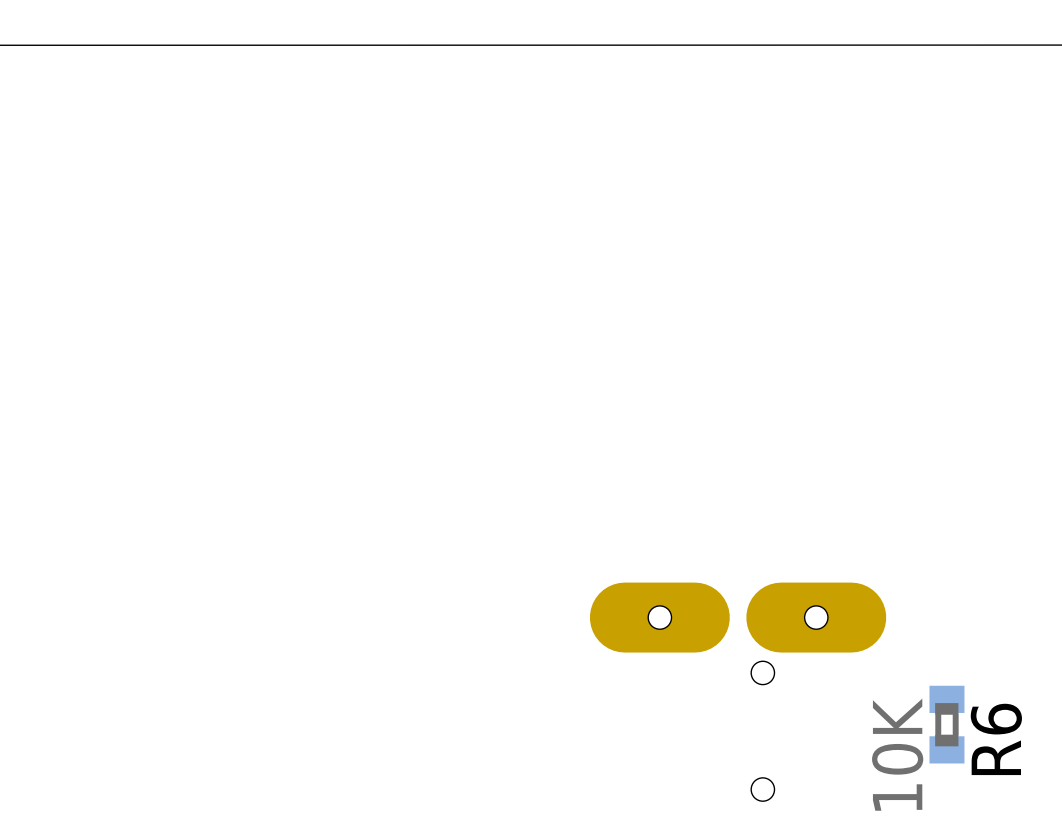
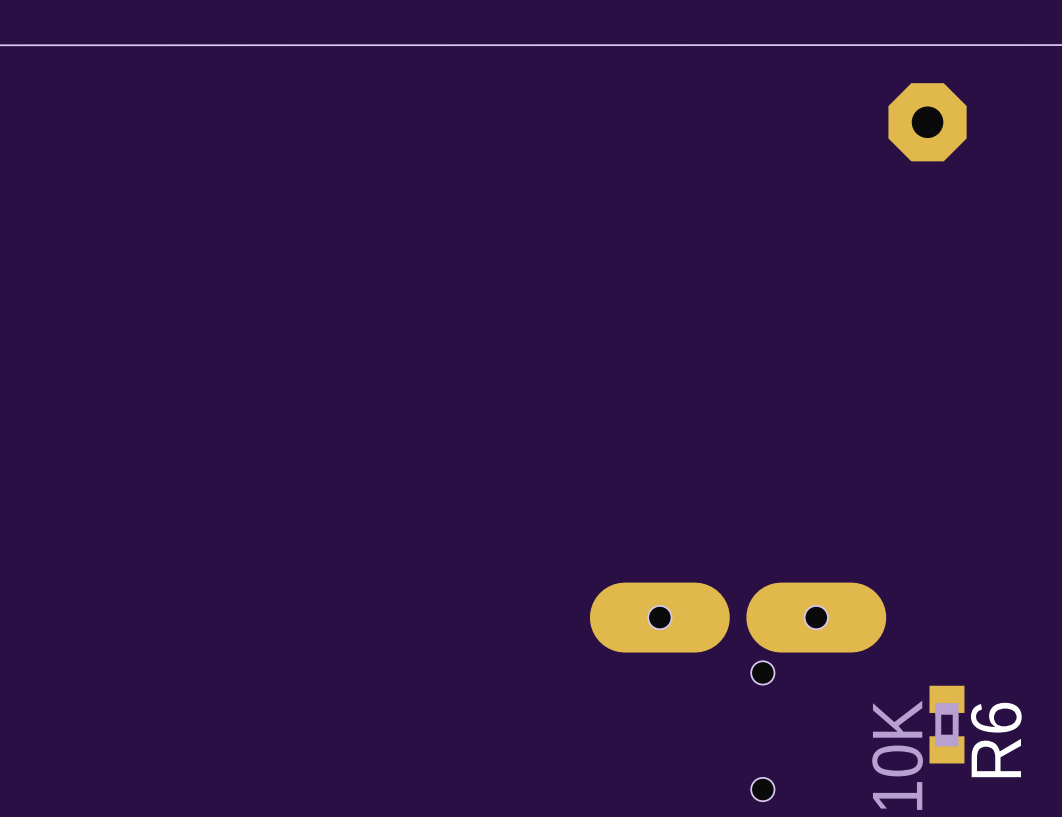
part: none -> (927, 122)

